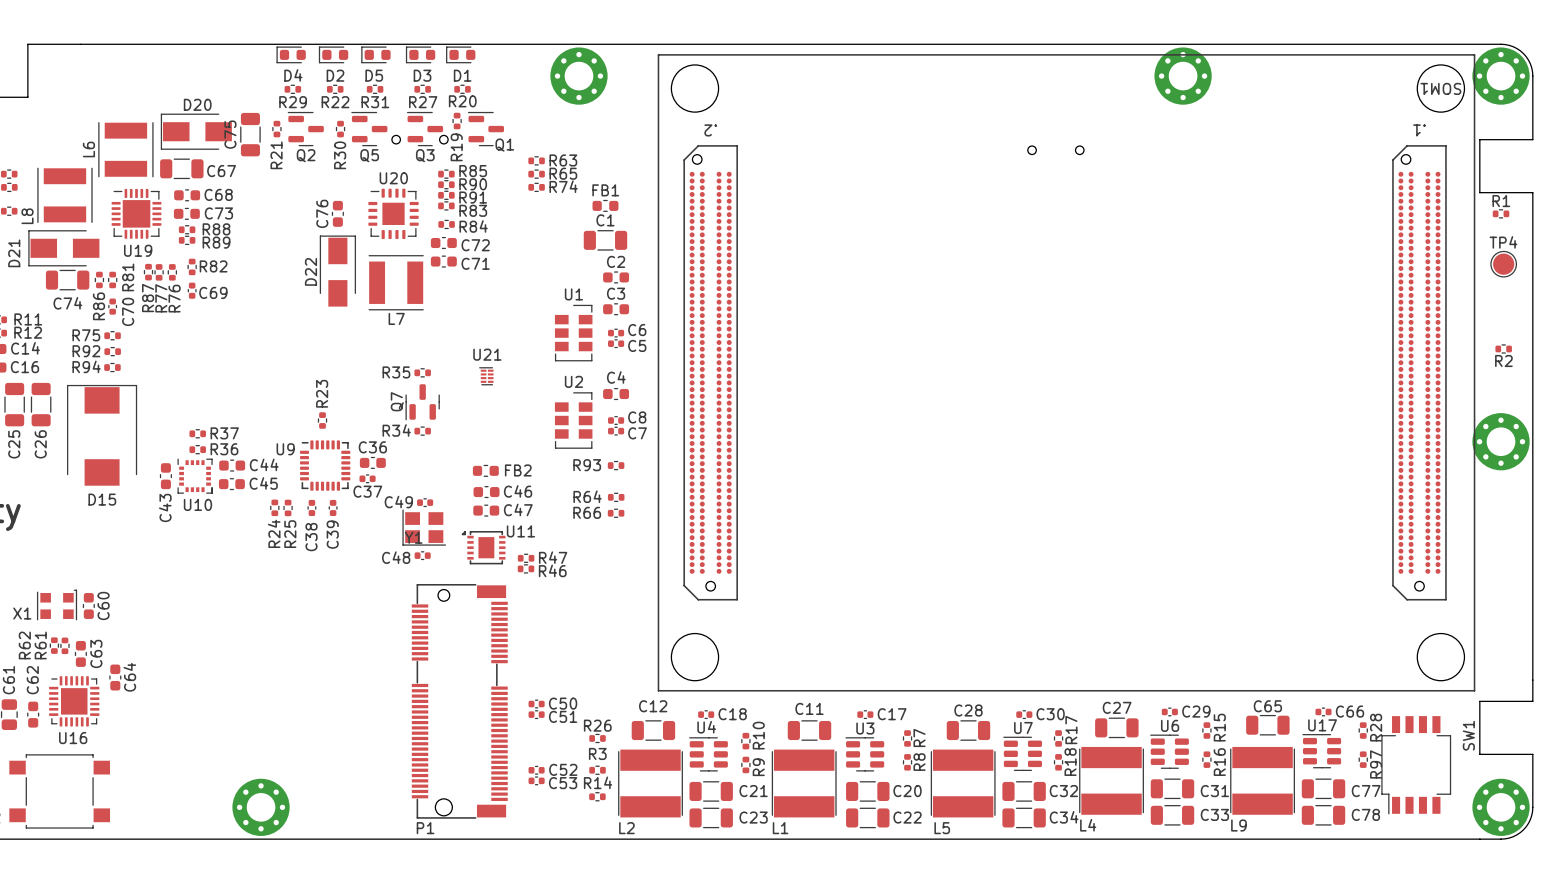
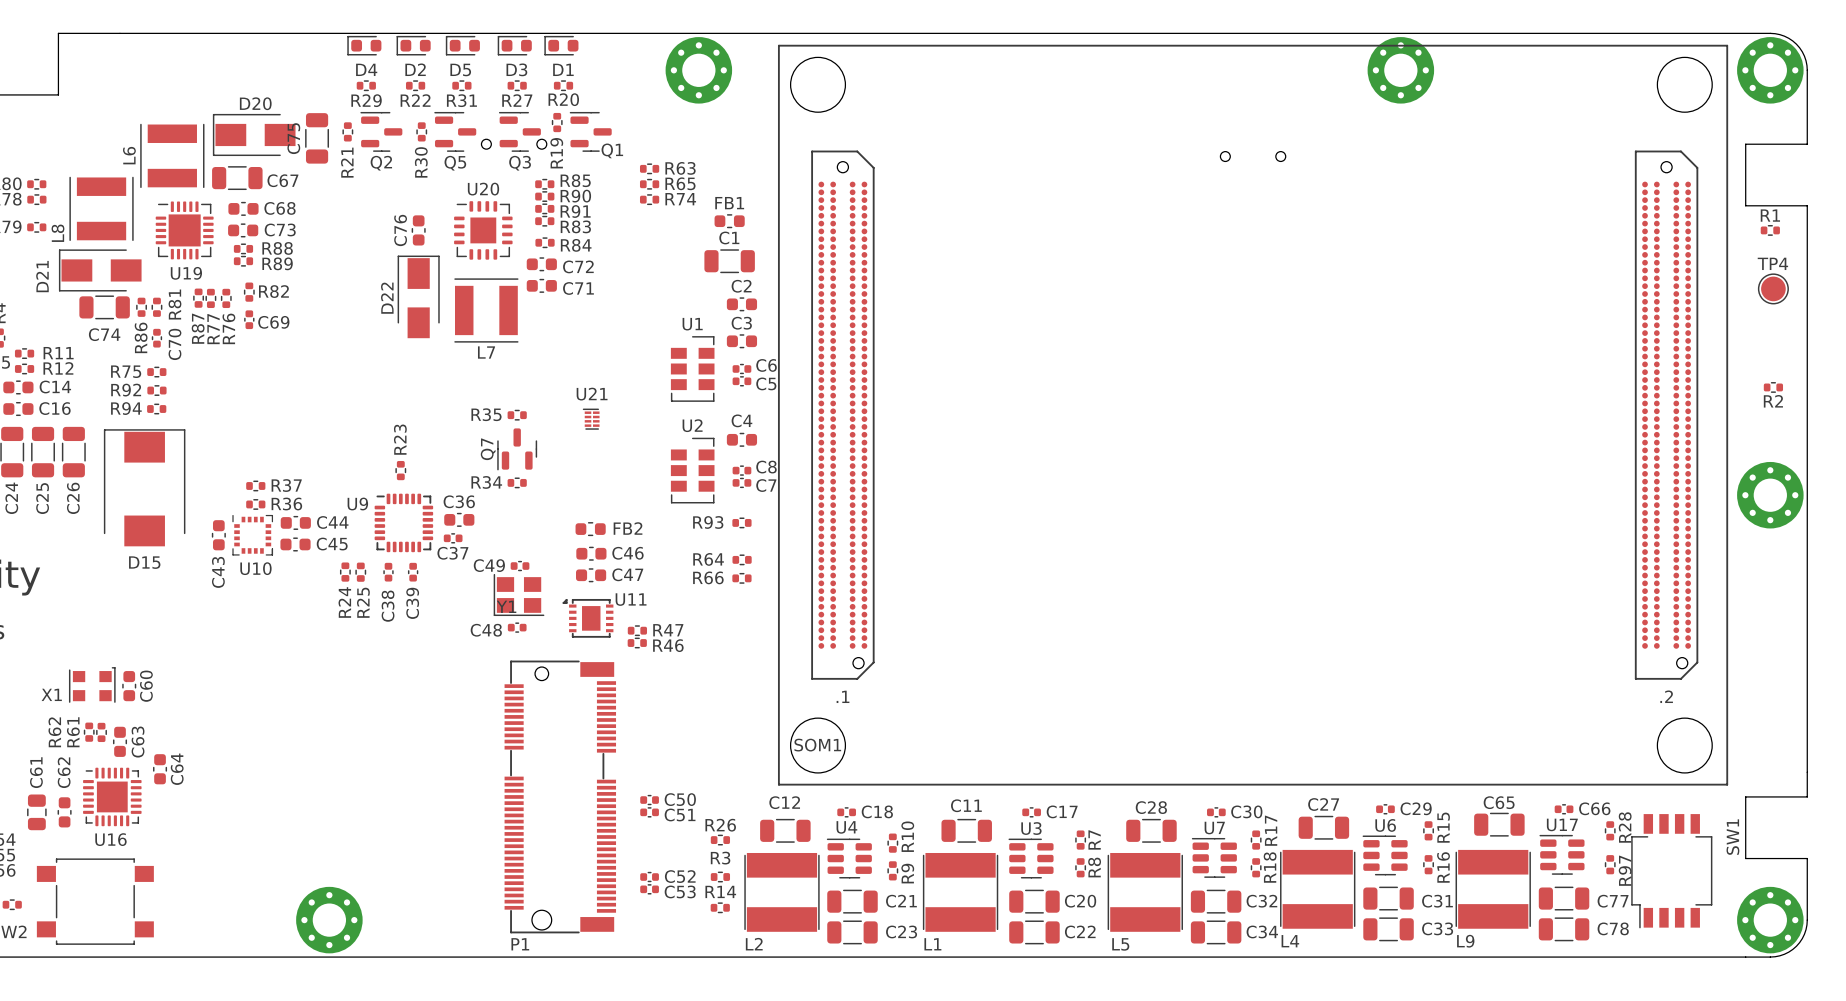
SOM1 rotation: 0° (1066, 372) -> 180° (1253, 415)

